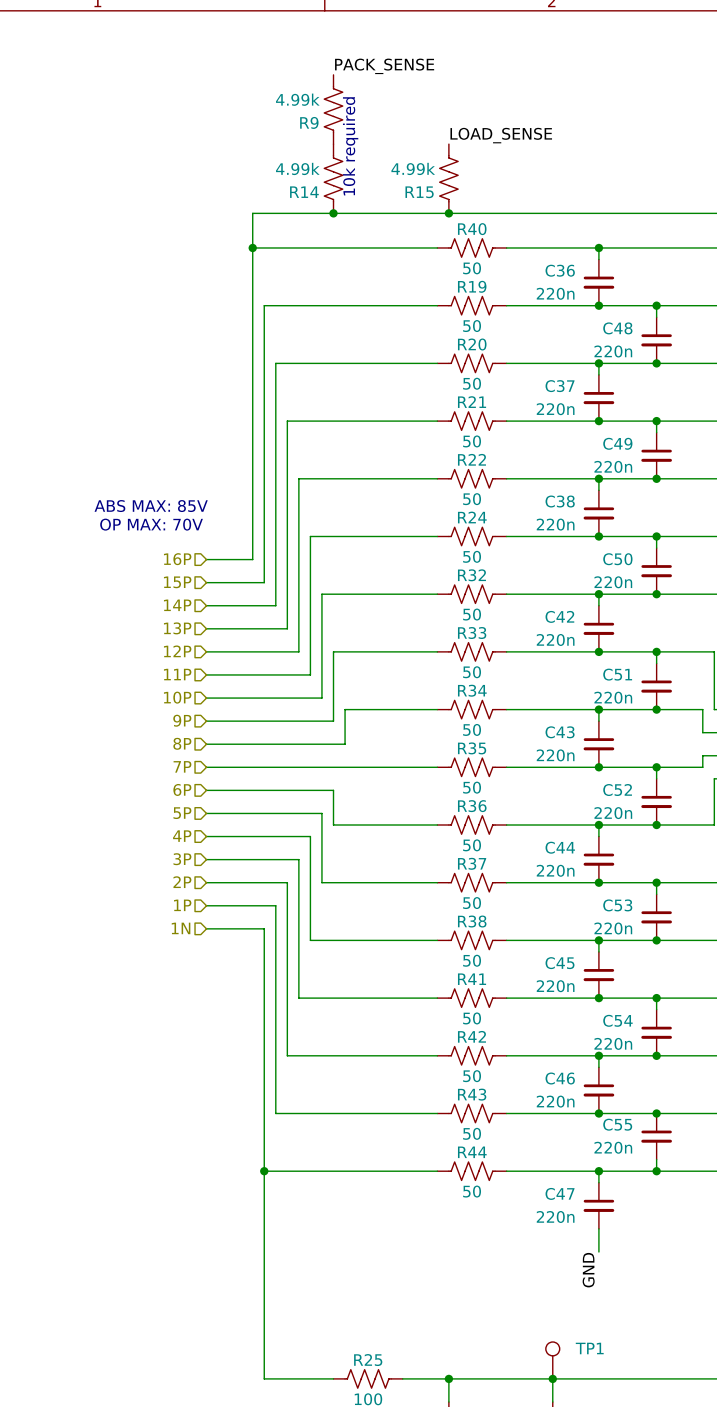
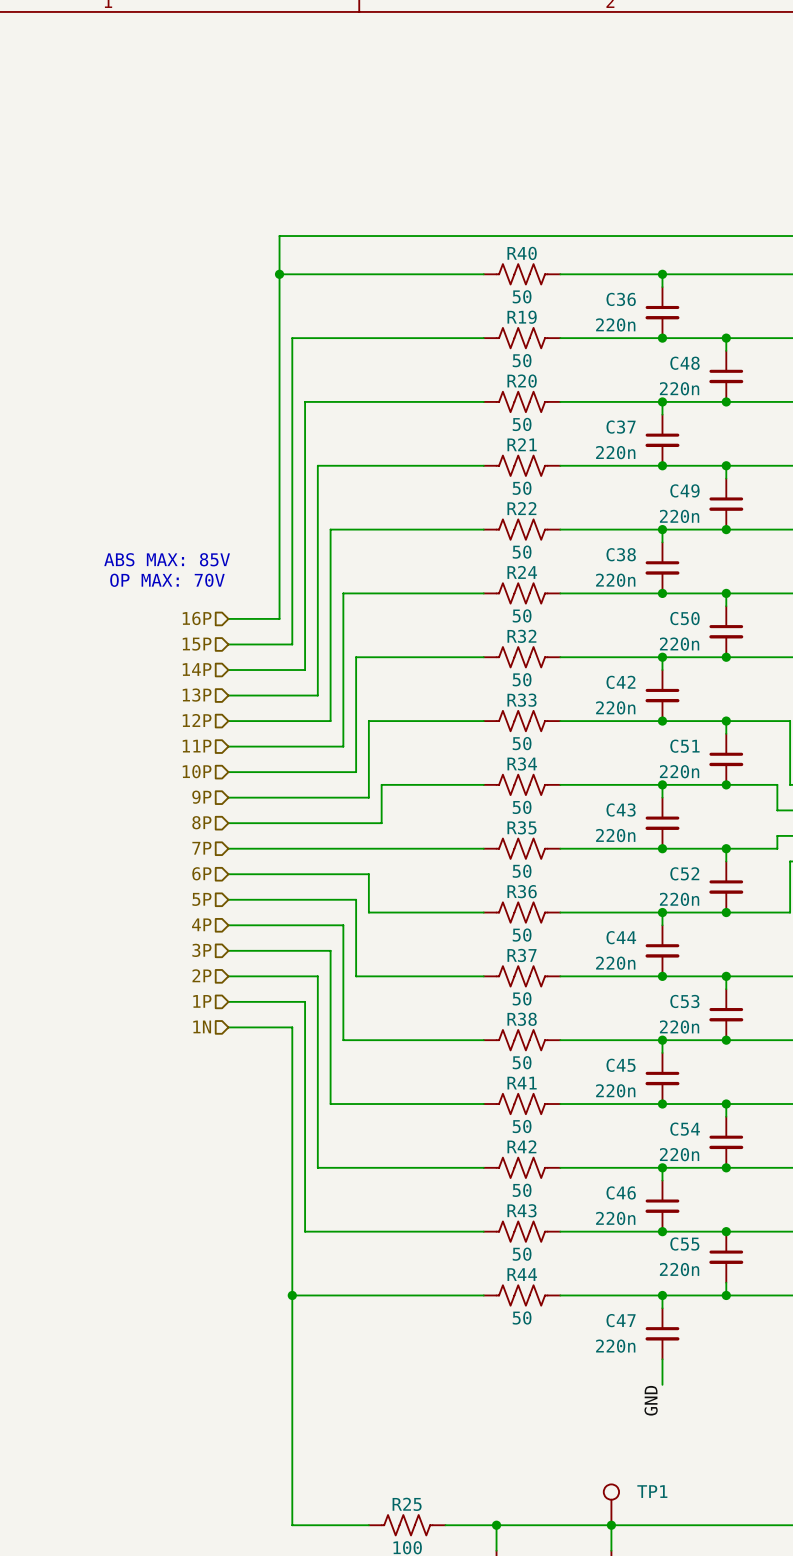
label: PACK_SENSE (384, 66) -> none
R9: 4.99k (333, 109) -> none
label: LOAD_SENSE (501, 135) -> none
text: 10k required (350, 146) -> none
R14: 4.99k (333, 178) -> none
R15: 4.99k (448, 178) -> none
junction: (333, 213) -> none
junction: (448, 213) -> none

